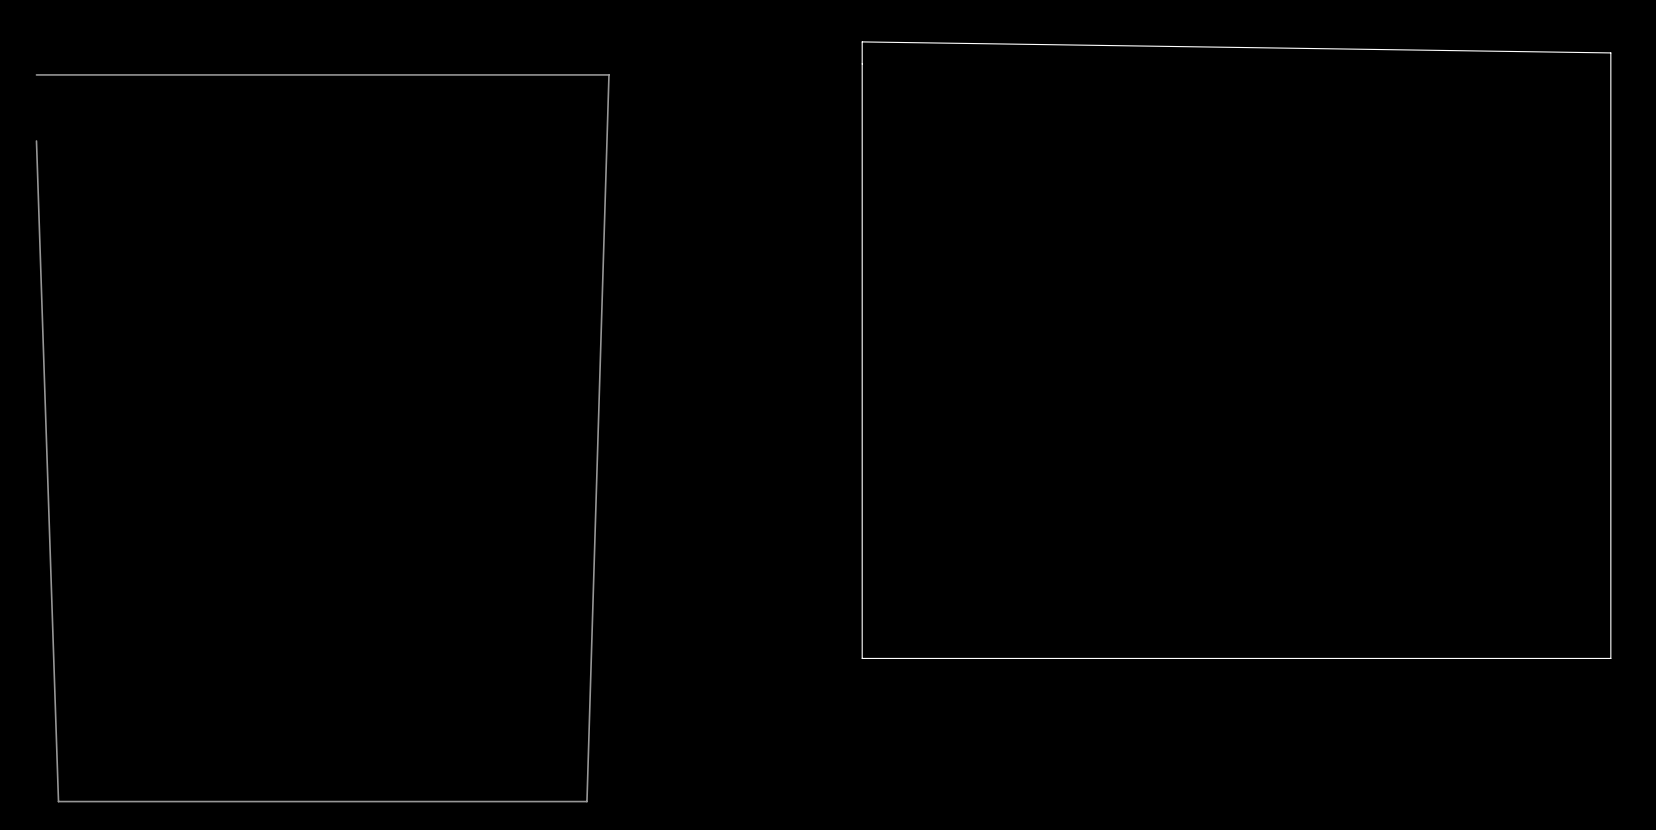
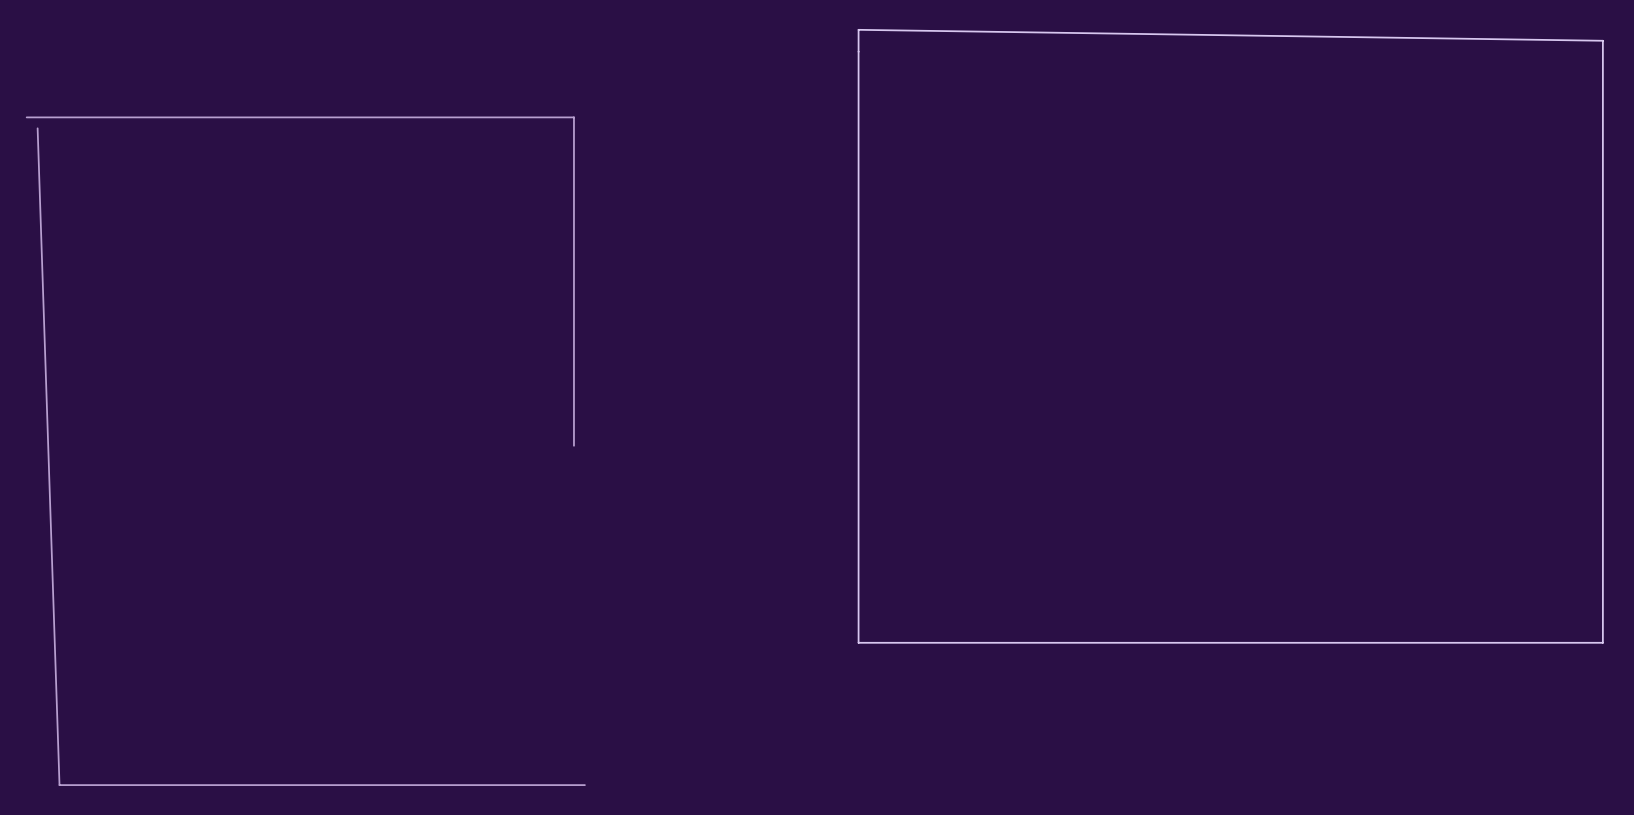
line: (36, 74) (608, 74) (586, 801) -> none
line: none -> (26, 117) (573, 117) (573, 445)

